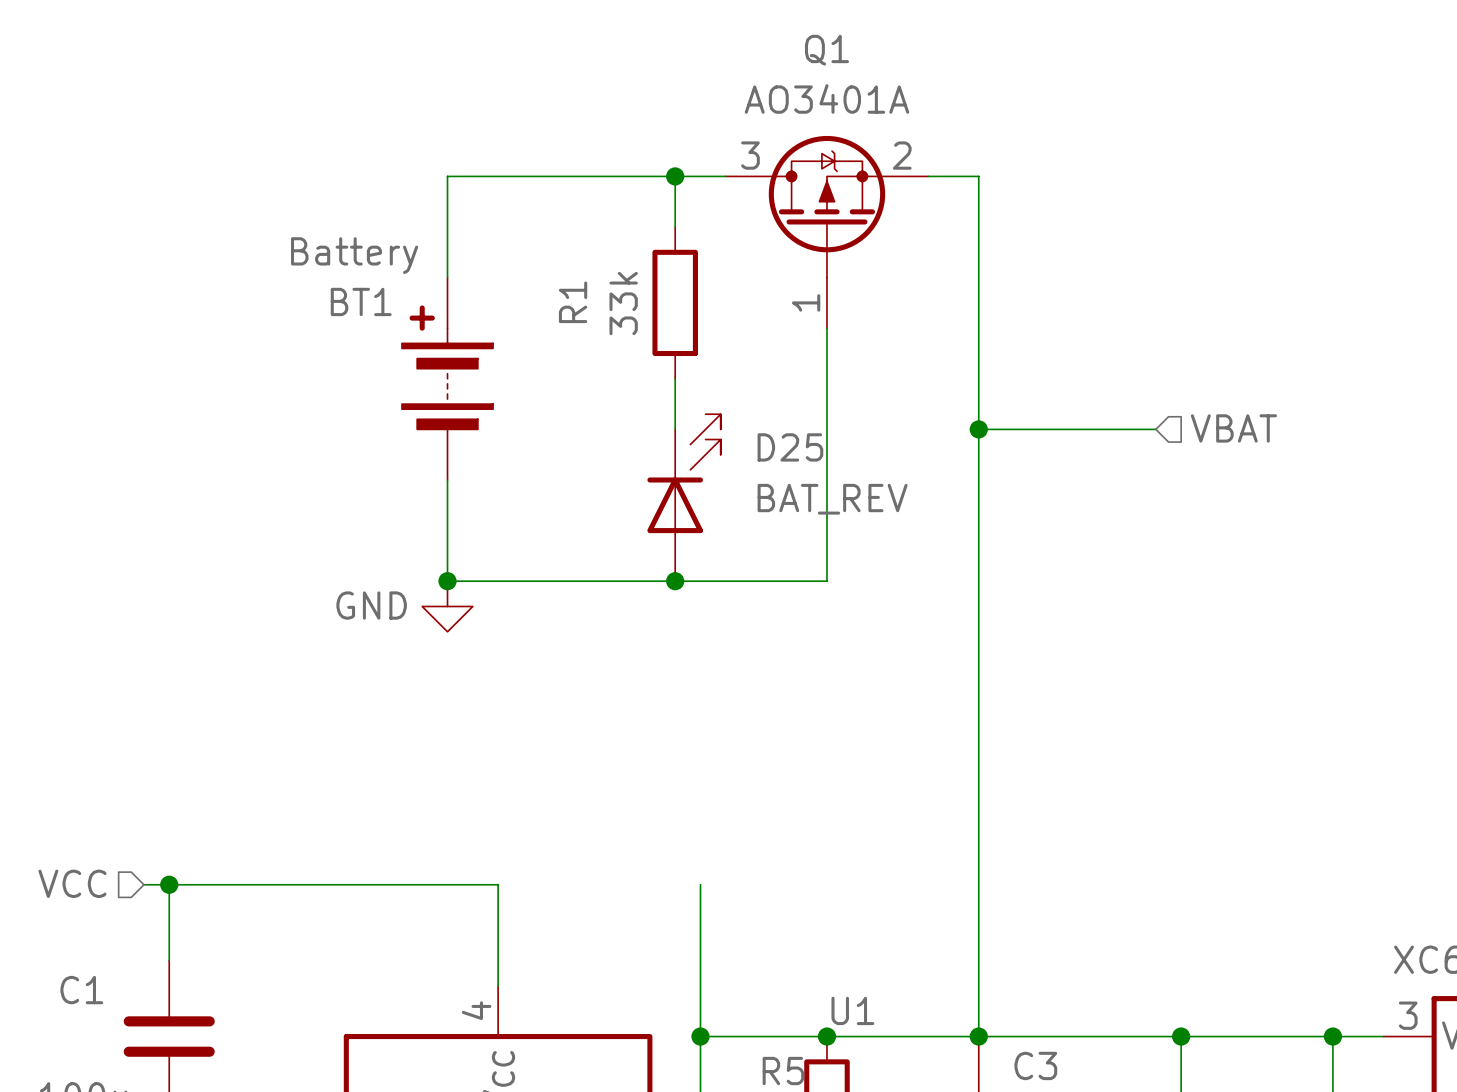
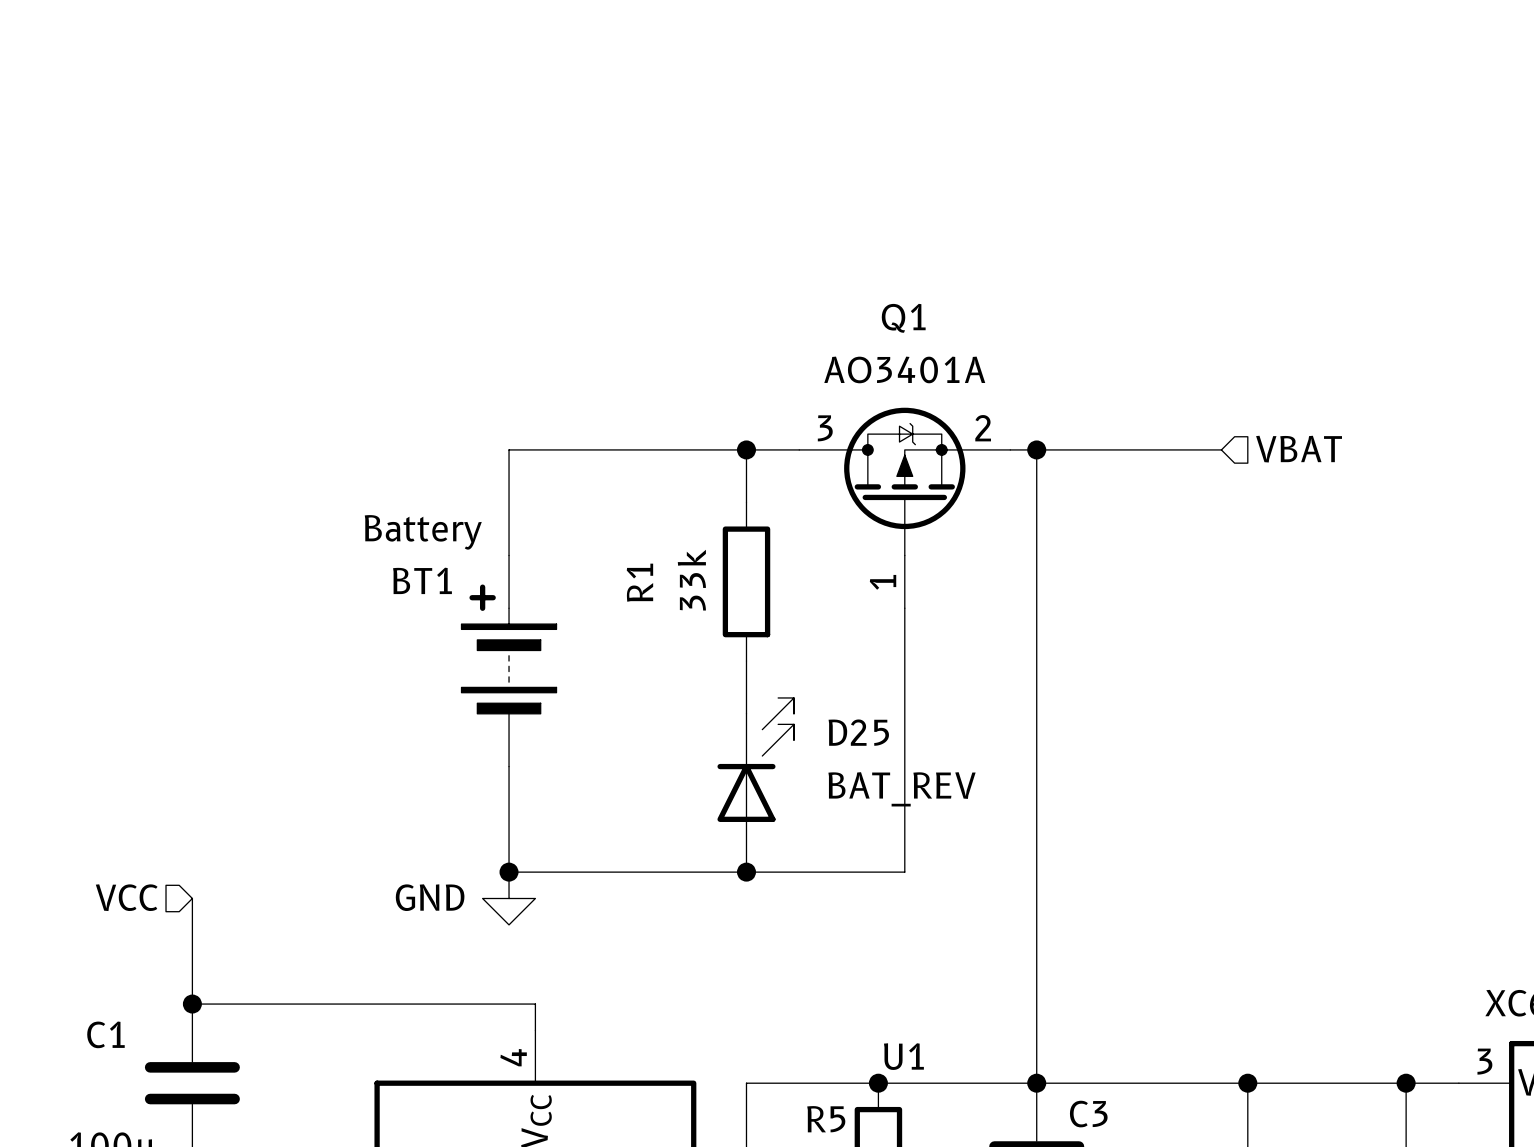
wire: (675, 176) (675, 227) -> (746, 449) (746, 502)
junction: (675, 176) -> none
wire: (725, 176) (447, 176) (447, 277) -> (799, 449) (509, 449) (509, 555)
wire: (928, 176) (978, 176) (978, 429) -> (1010, 449) (1036, 449)
Q1 position: (826, 232) -> (904, 508)
R1 position: (675, 302) -> (746, 581)
wire: (826, 328) (826, 581) (447, 581) (447, 480) -> (904, 608) (904, 872) (509, 872) (509, 766)
BT1 position: (447, 378) -> (509, 661)
wire: (675, 378) (675, 429) -> (746, 661) (746, 713)
junction: none -> (746, 449)
D25 position: (684, 497) -> (755, 785)
junction: (447, 581) -> none
junction: (675, 581) -> none
power symbol position: GND (447, 606) -> GND (509, 898)
junction: none -> (509, 872)
junction: none -> (746, 872)
wire: none -> (192, 898) (192, 924)
hierarchical label position: VCC (72, 883) -> VCC (126, 897)
wire: (143, 884) (498, 884) (498, 960) -> (192, 1004) (535, 1004)
junction position: (169, 884) -> (192, 1004)
wire: (700, 884) (700, 1036) -> none
junction: (700, 1036) -> none

